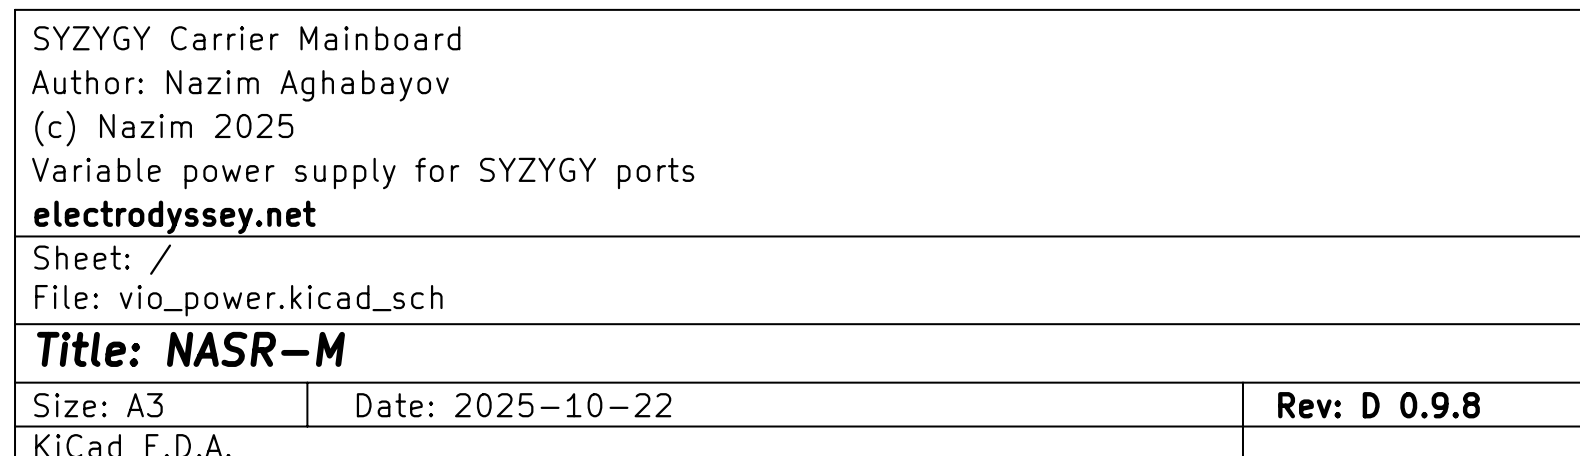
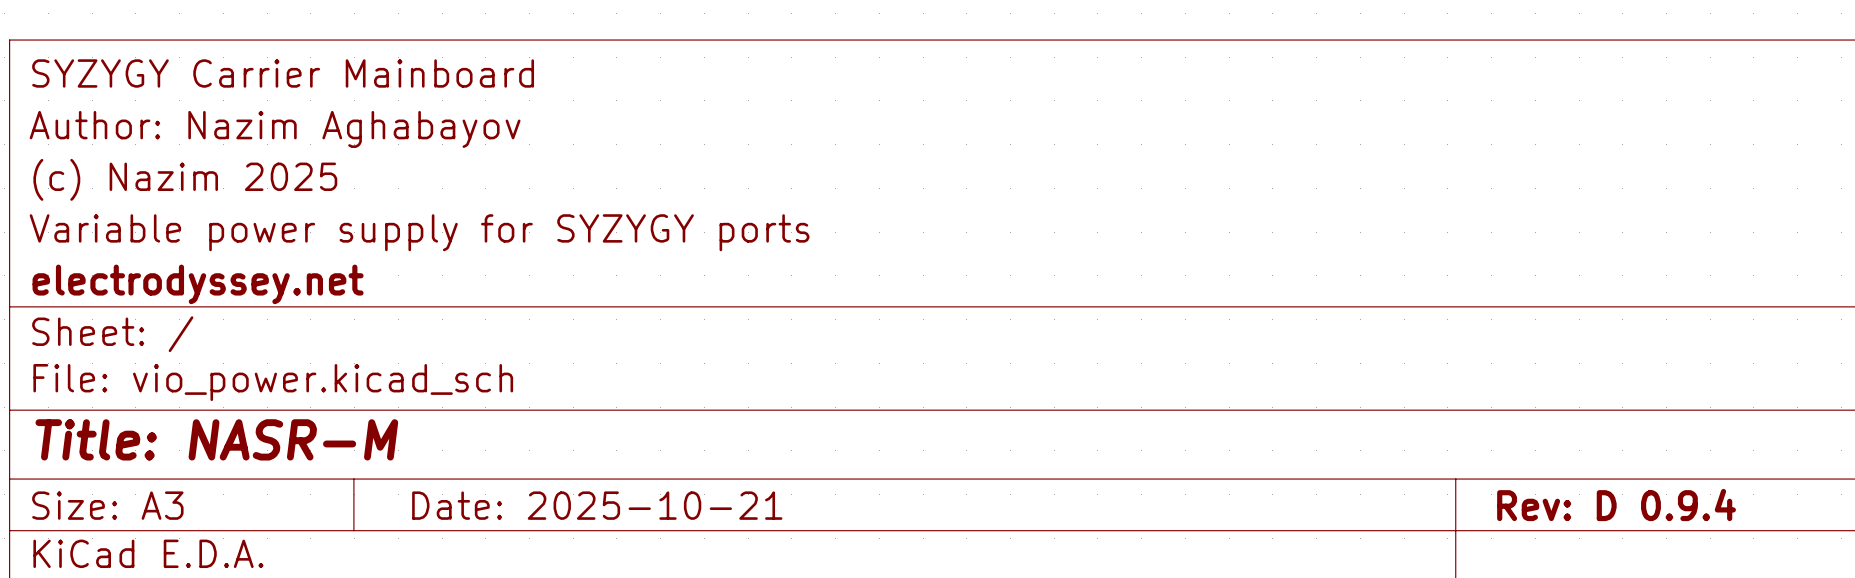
title block: Date: 2025-10-22 (514, 405) -> Date: 2025-10-21 (597, 505)
title block: Rev: D 0.9.8 (1379, 405) -> Rev: D 0.9.4 (1616, 505)

